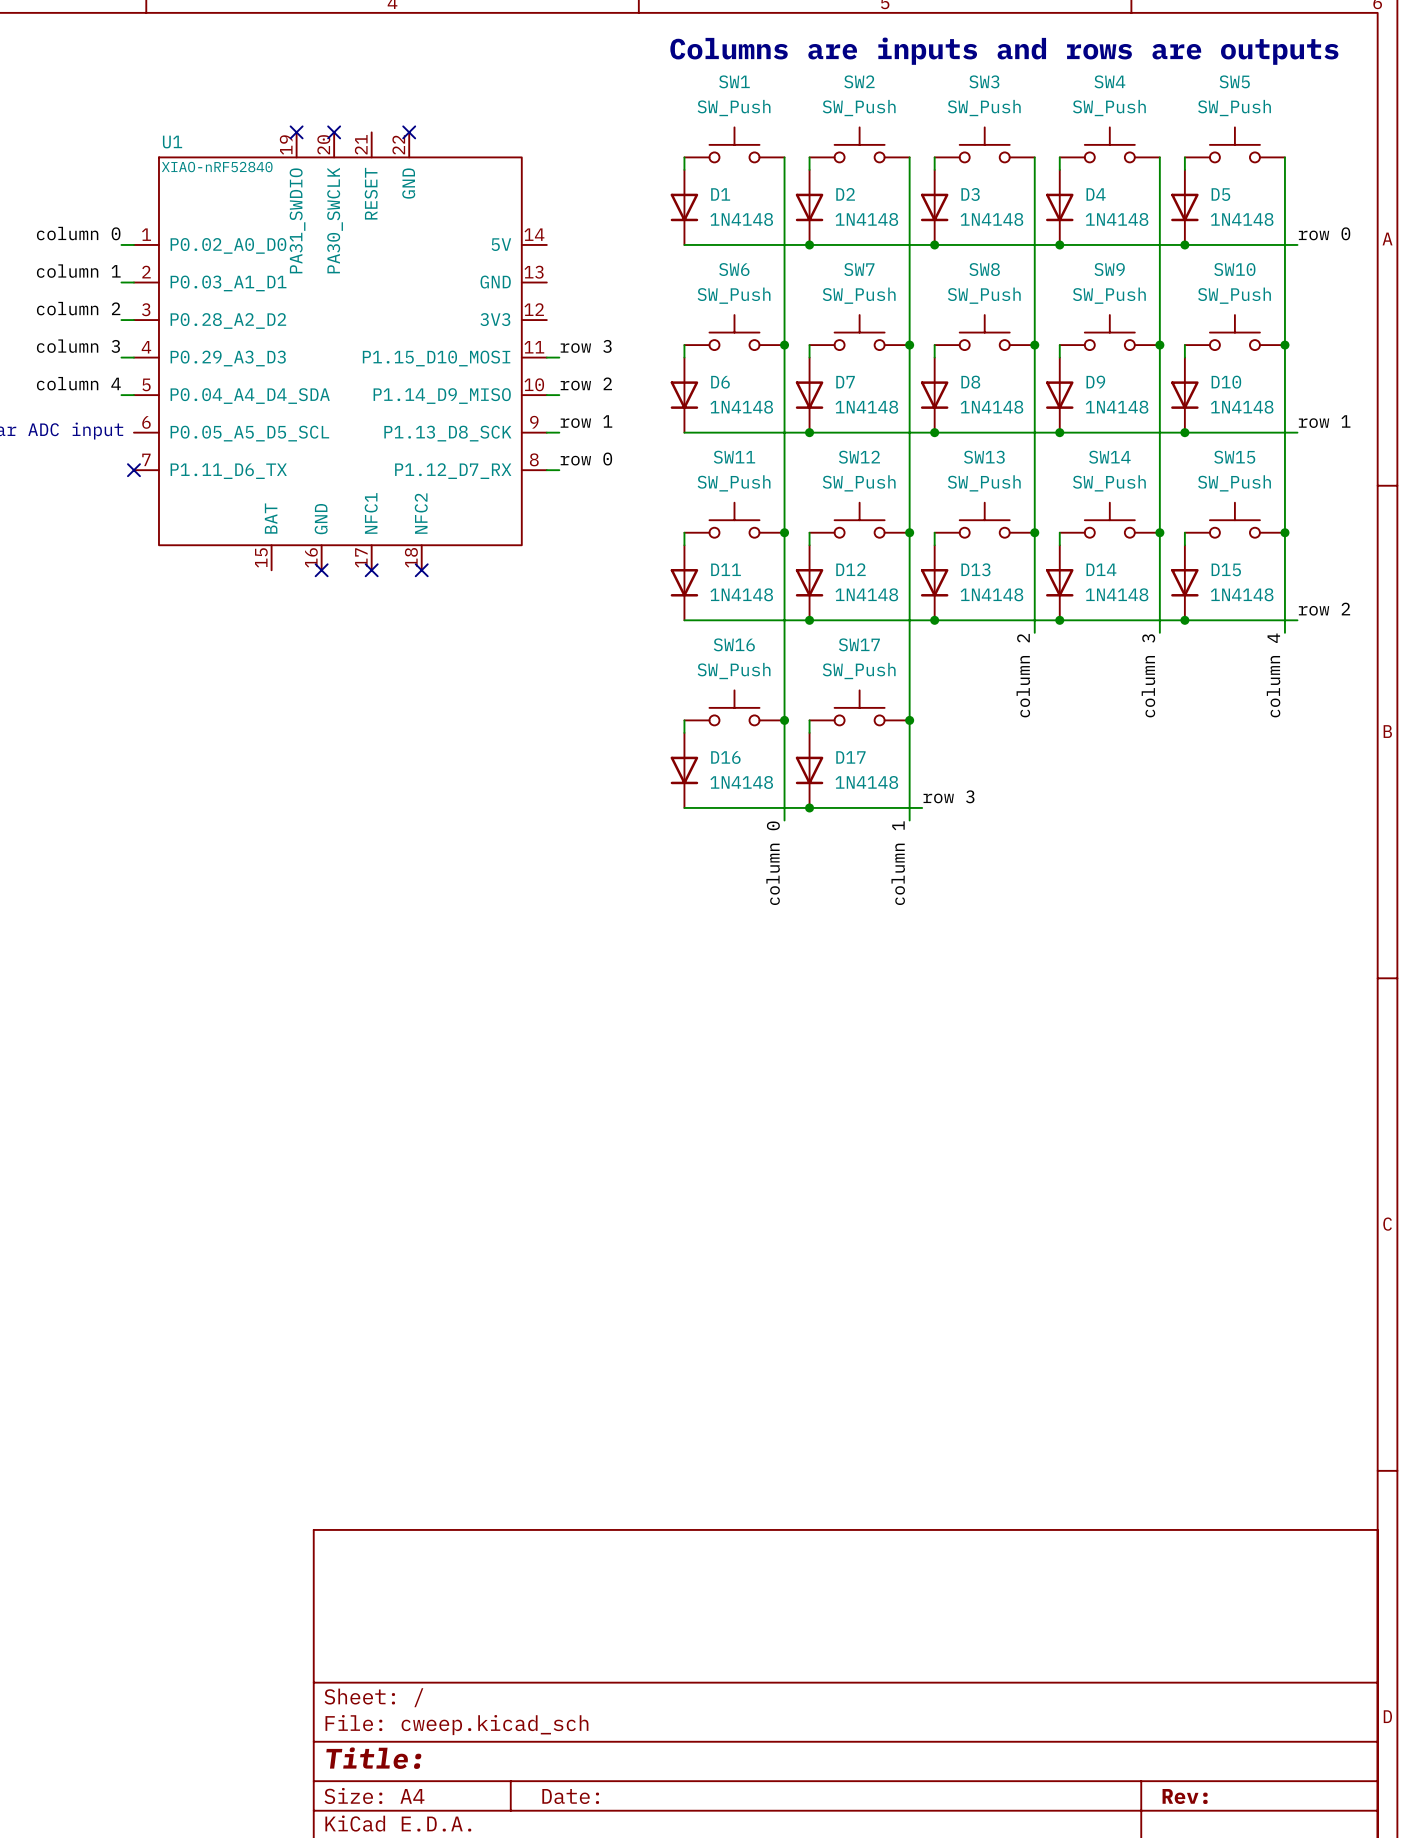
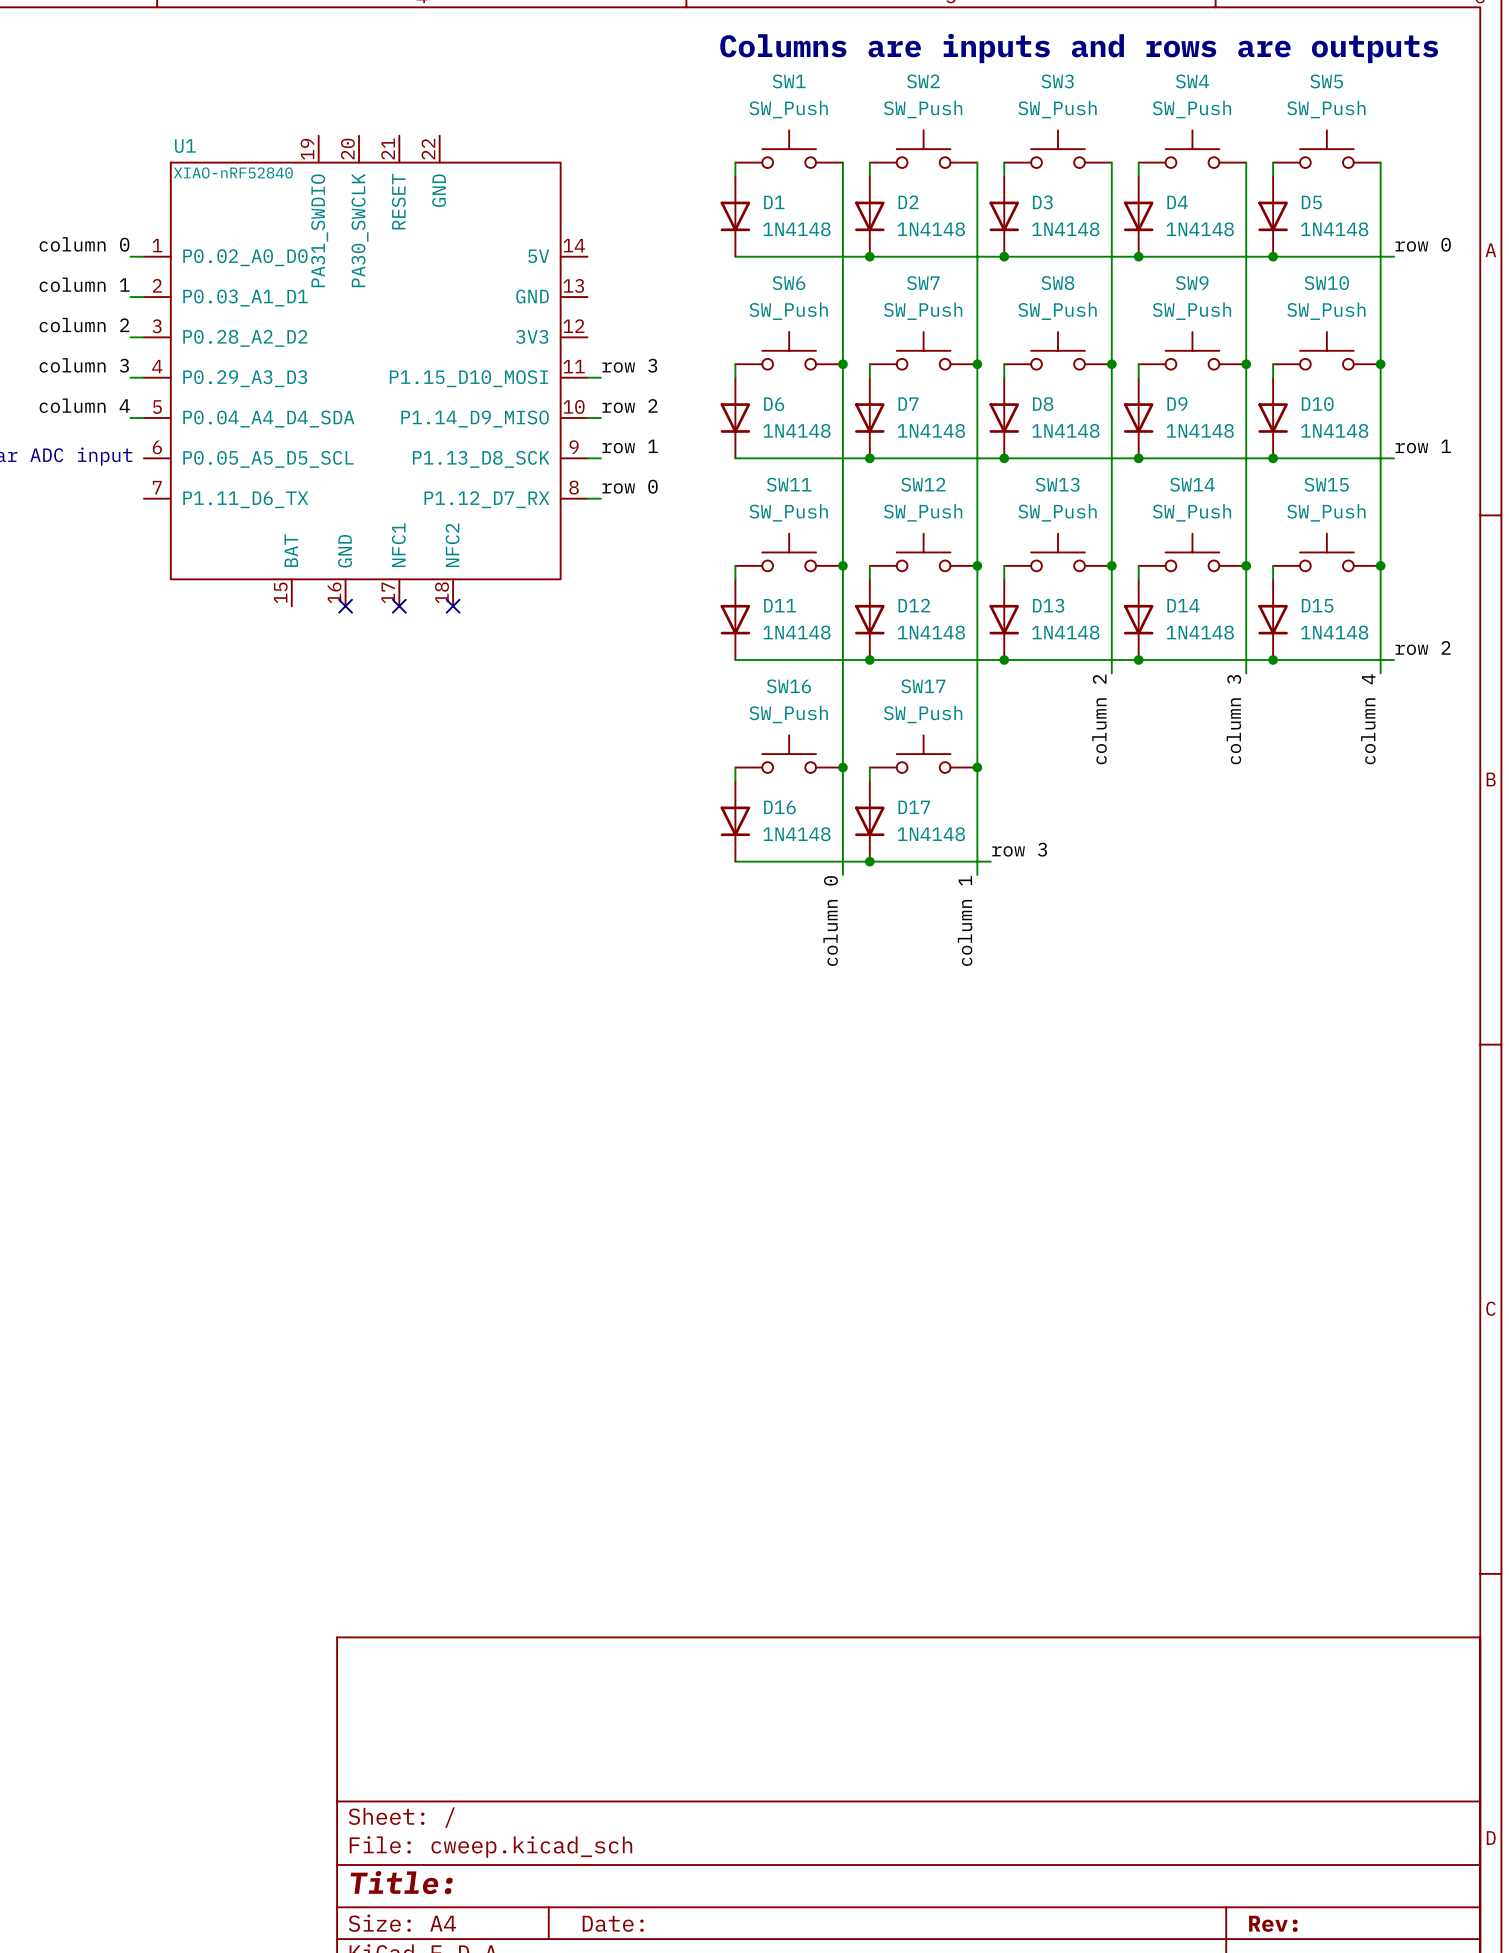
no-connect mark: (296, 132) -> none
no-connect mark: (334, 132) -> none
no-connect mark: (409, 132) -> none
no-connect mark: (133, 470) -> none

